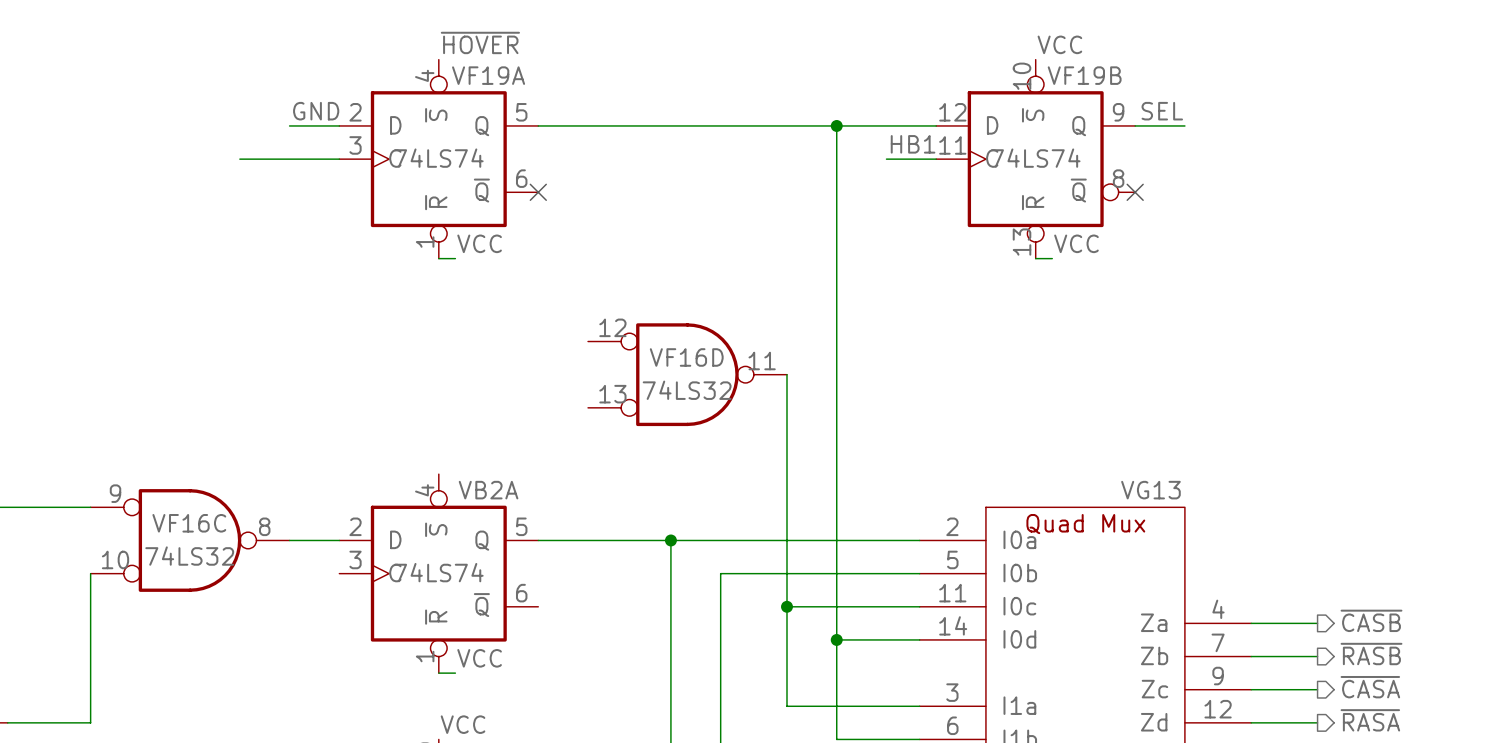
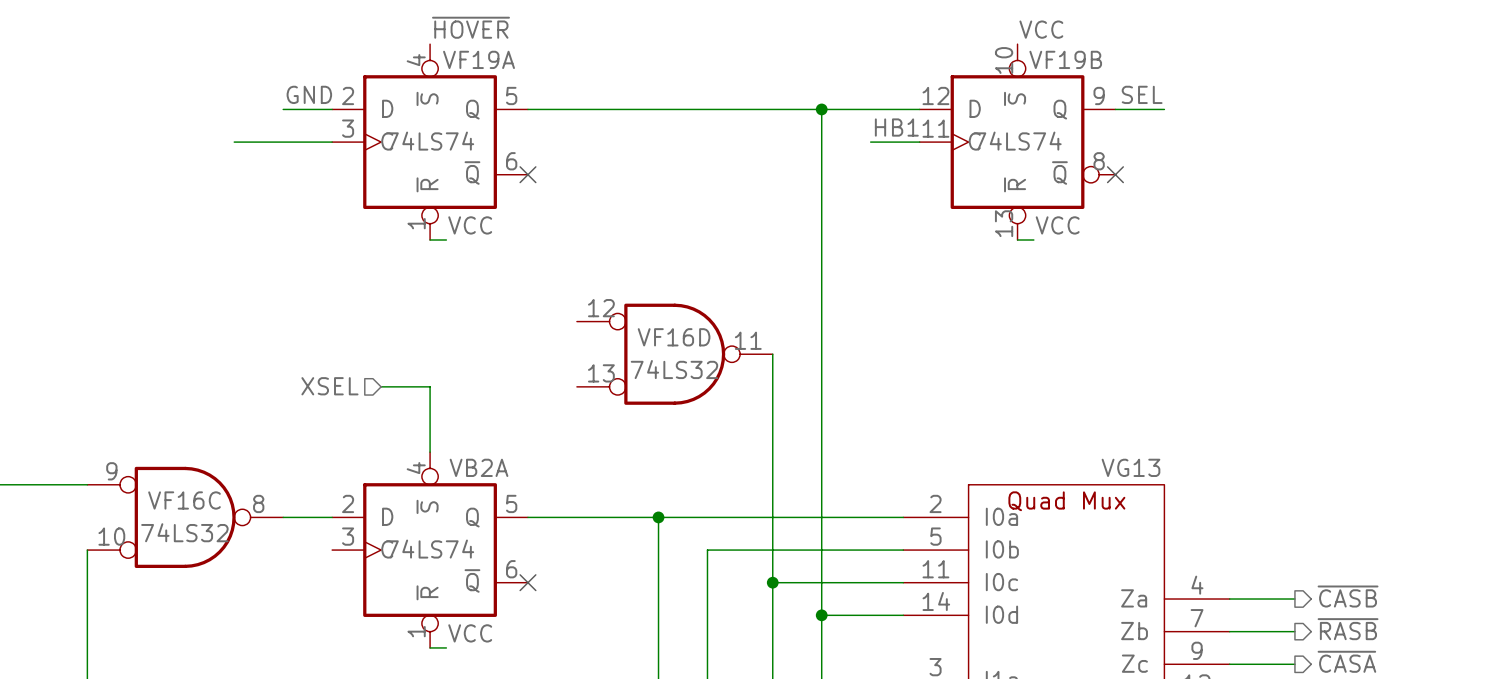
hierarchical label: none -> XSEL (329, 386)
wire: none -> (381, 386) (430, 386) (430, 452)
no-connect mark: none -> (527, 582)

